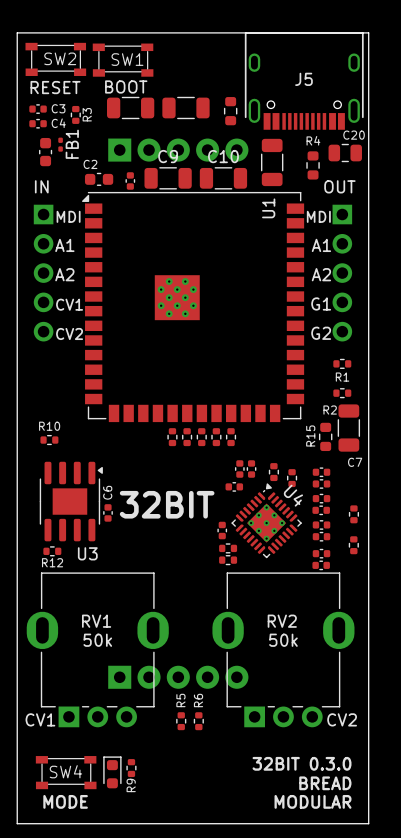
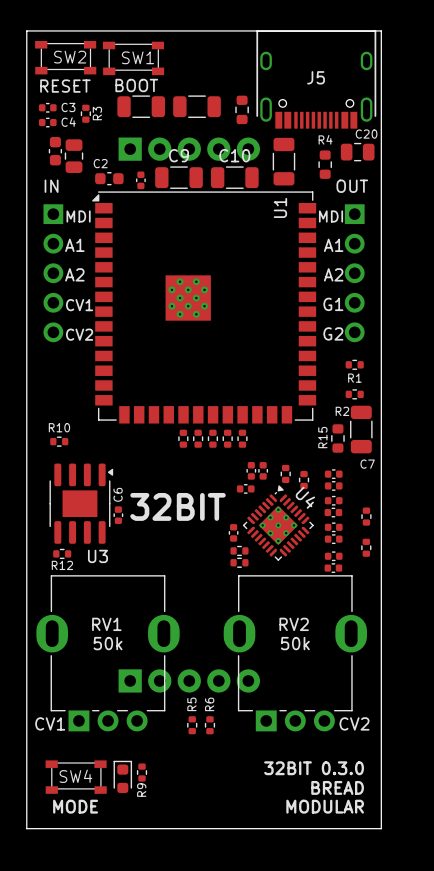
FB1: (60, 144) -> none
part: none -> (74, 156)

